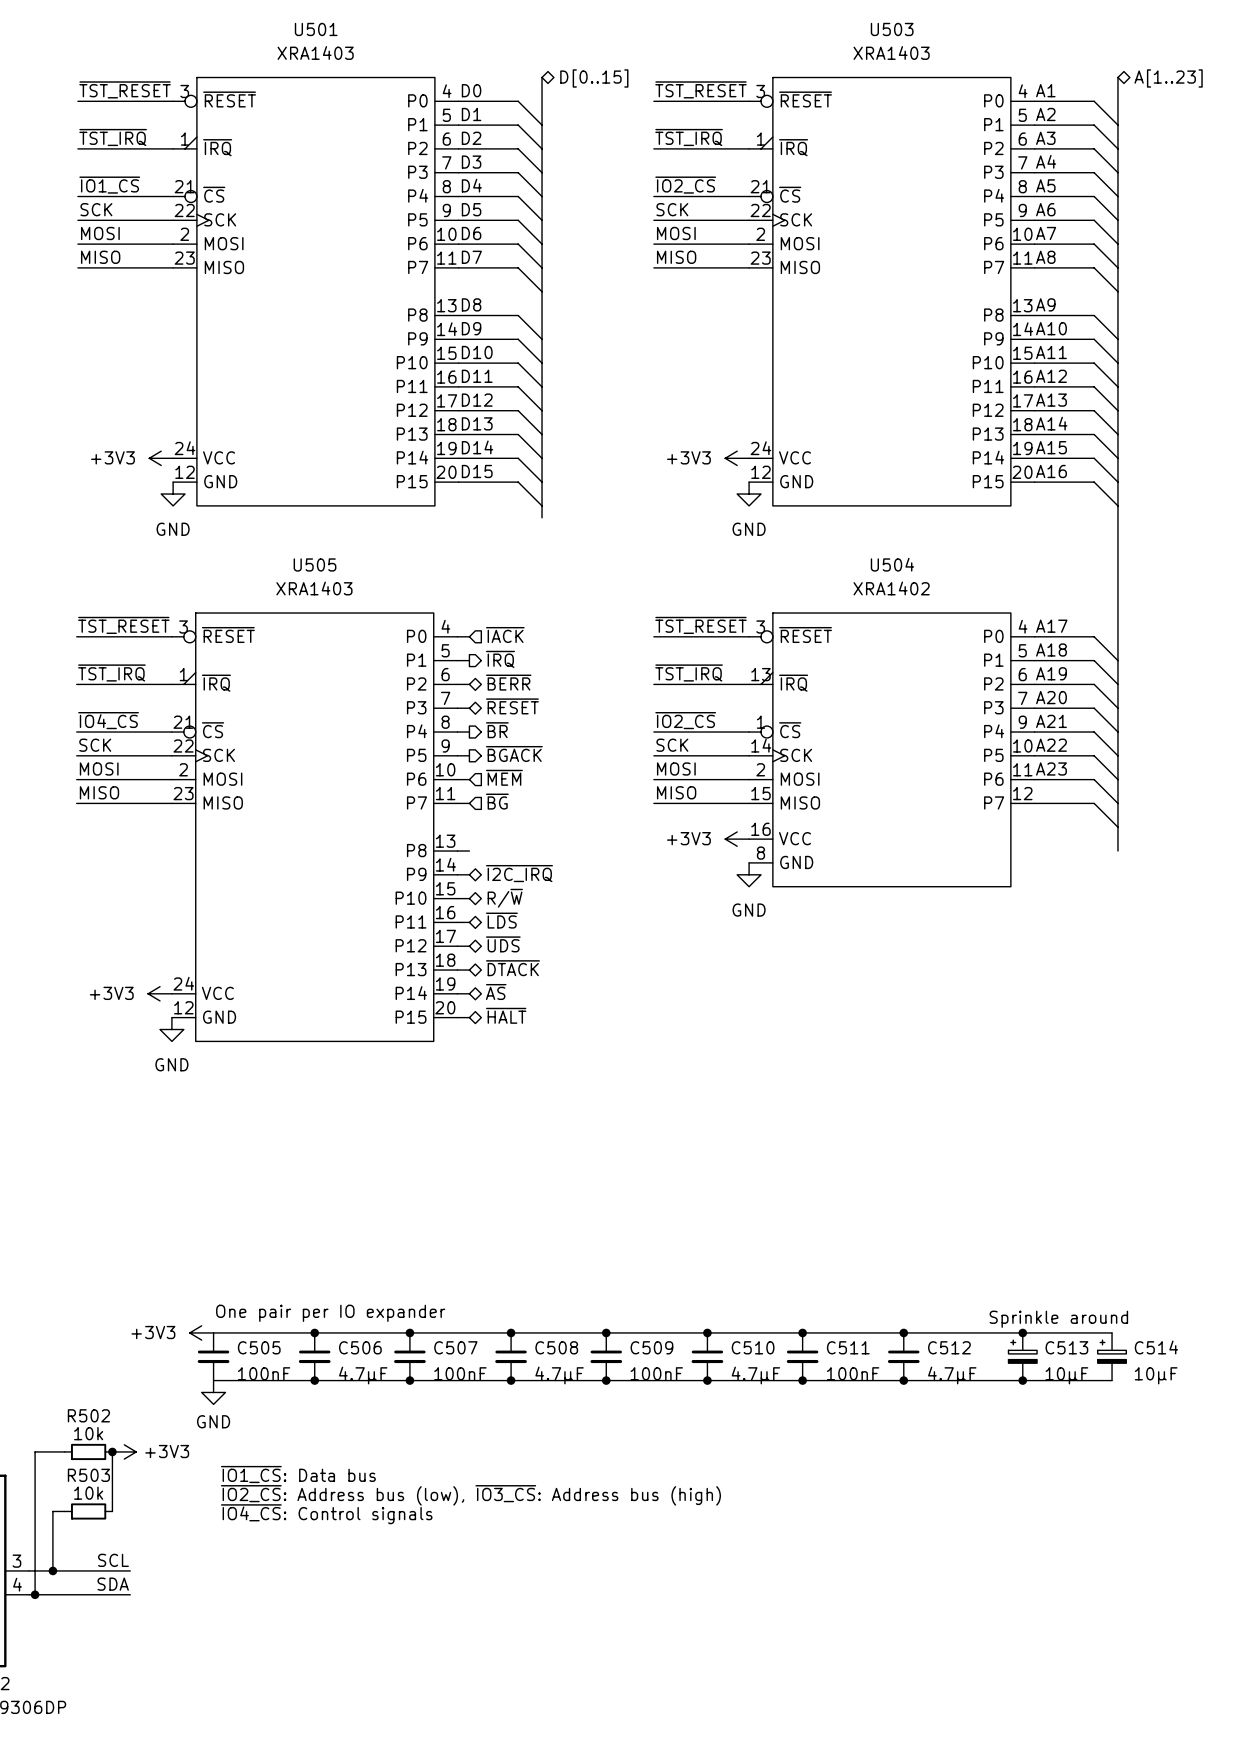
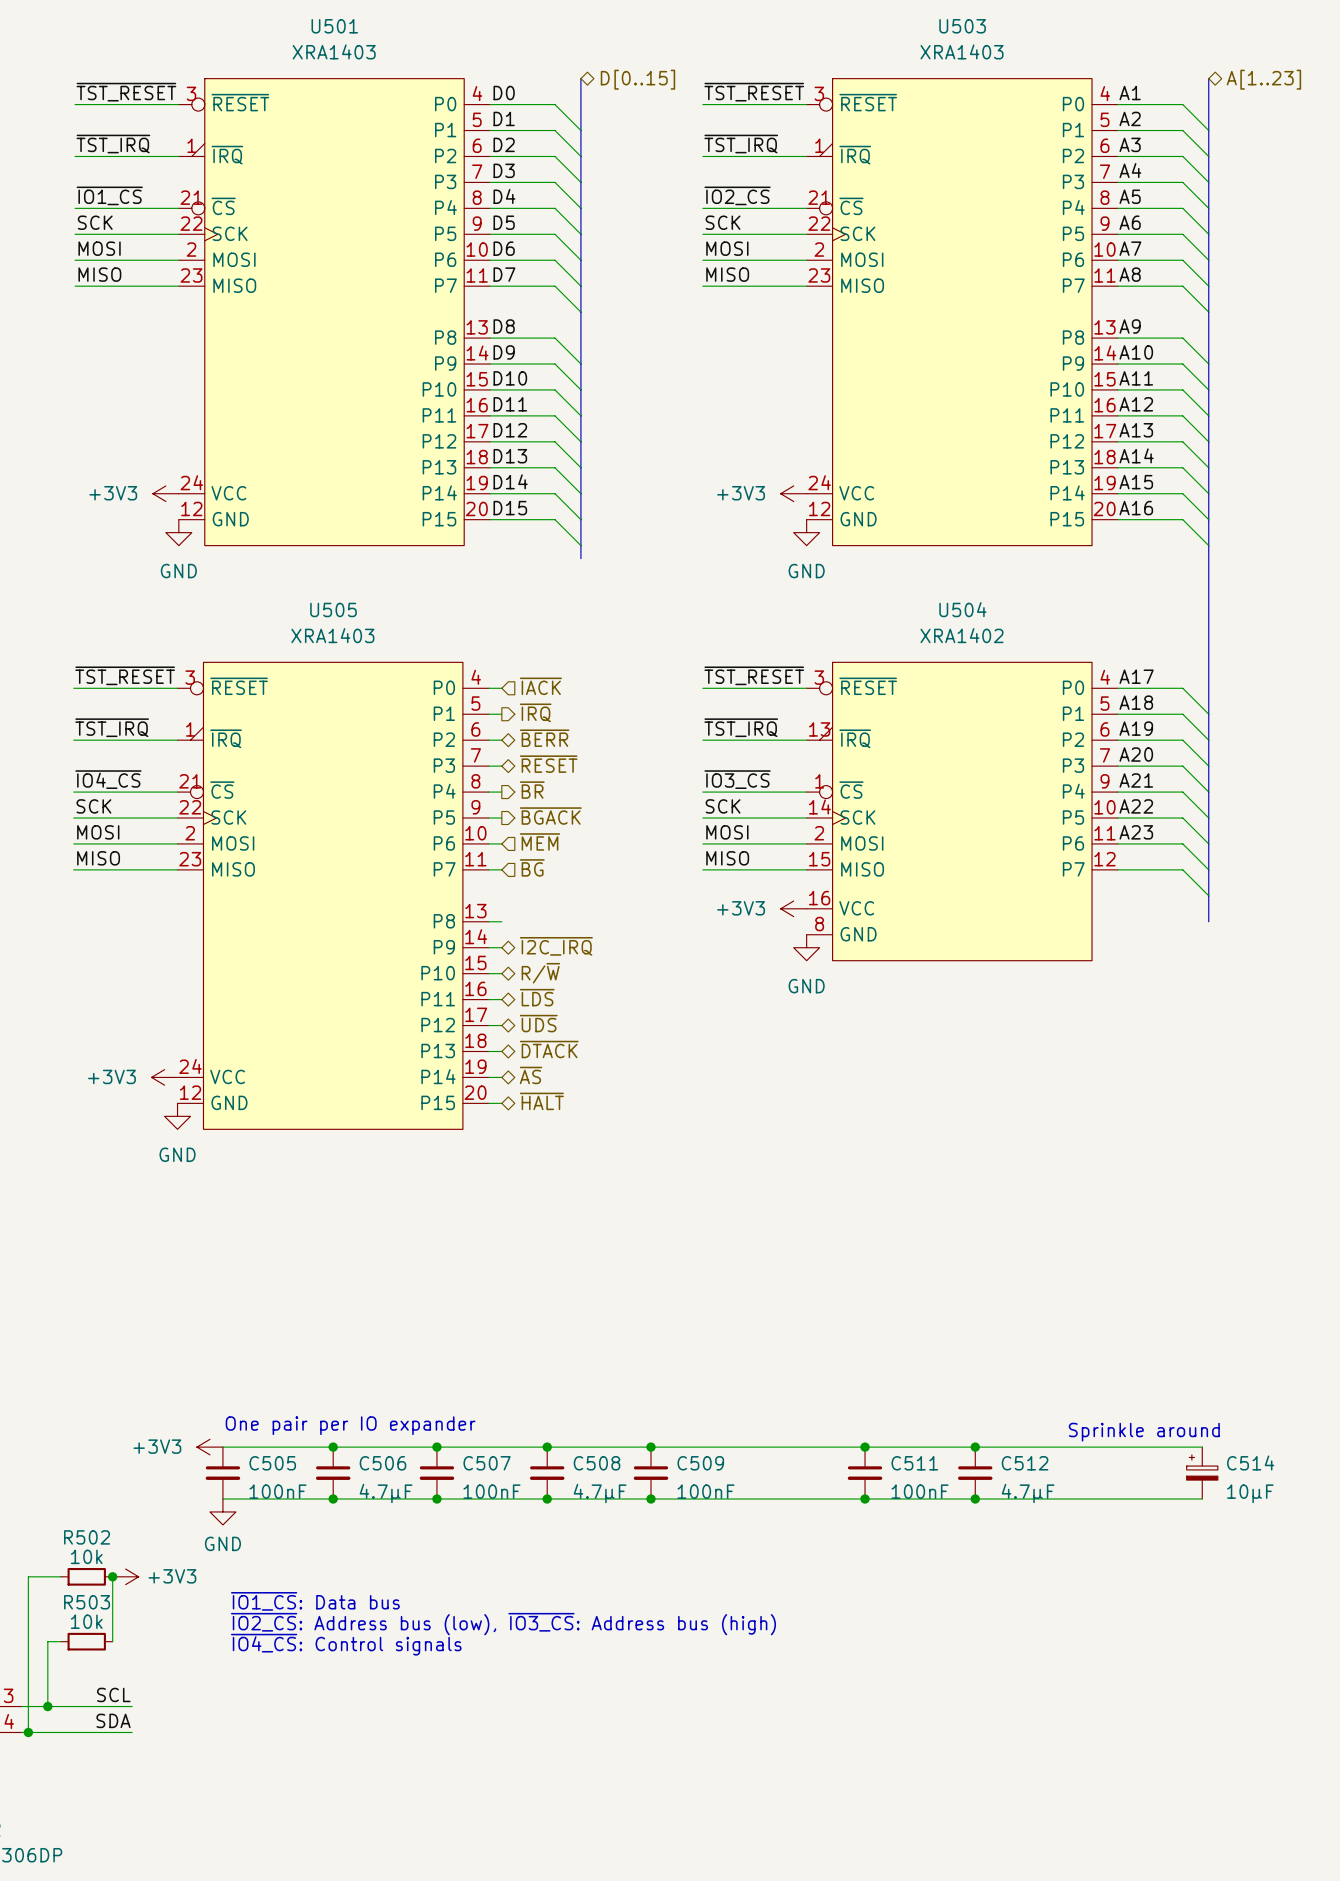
label: ~{IO2_CS} (685, 720) -> ~{IO3_CS} (737, 779)
junction: (707, 1332) -> none
junction: (1022, 1332) -> none
C510: 4.7µF (707, 1356) -> none
C513: 10µF (1022, 1356) -> none
junction: (707, 1380) -> none
junction: (1022, 1380) -> none

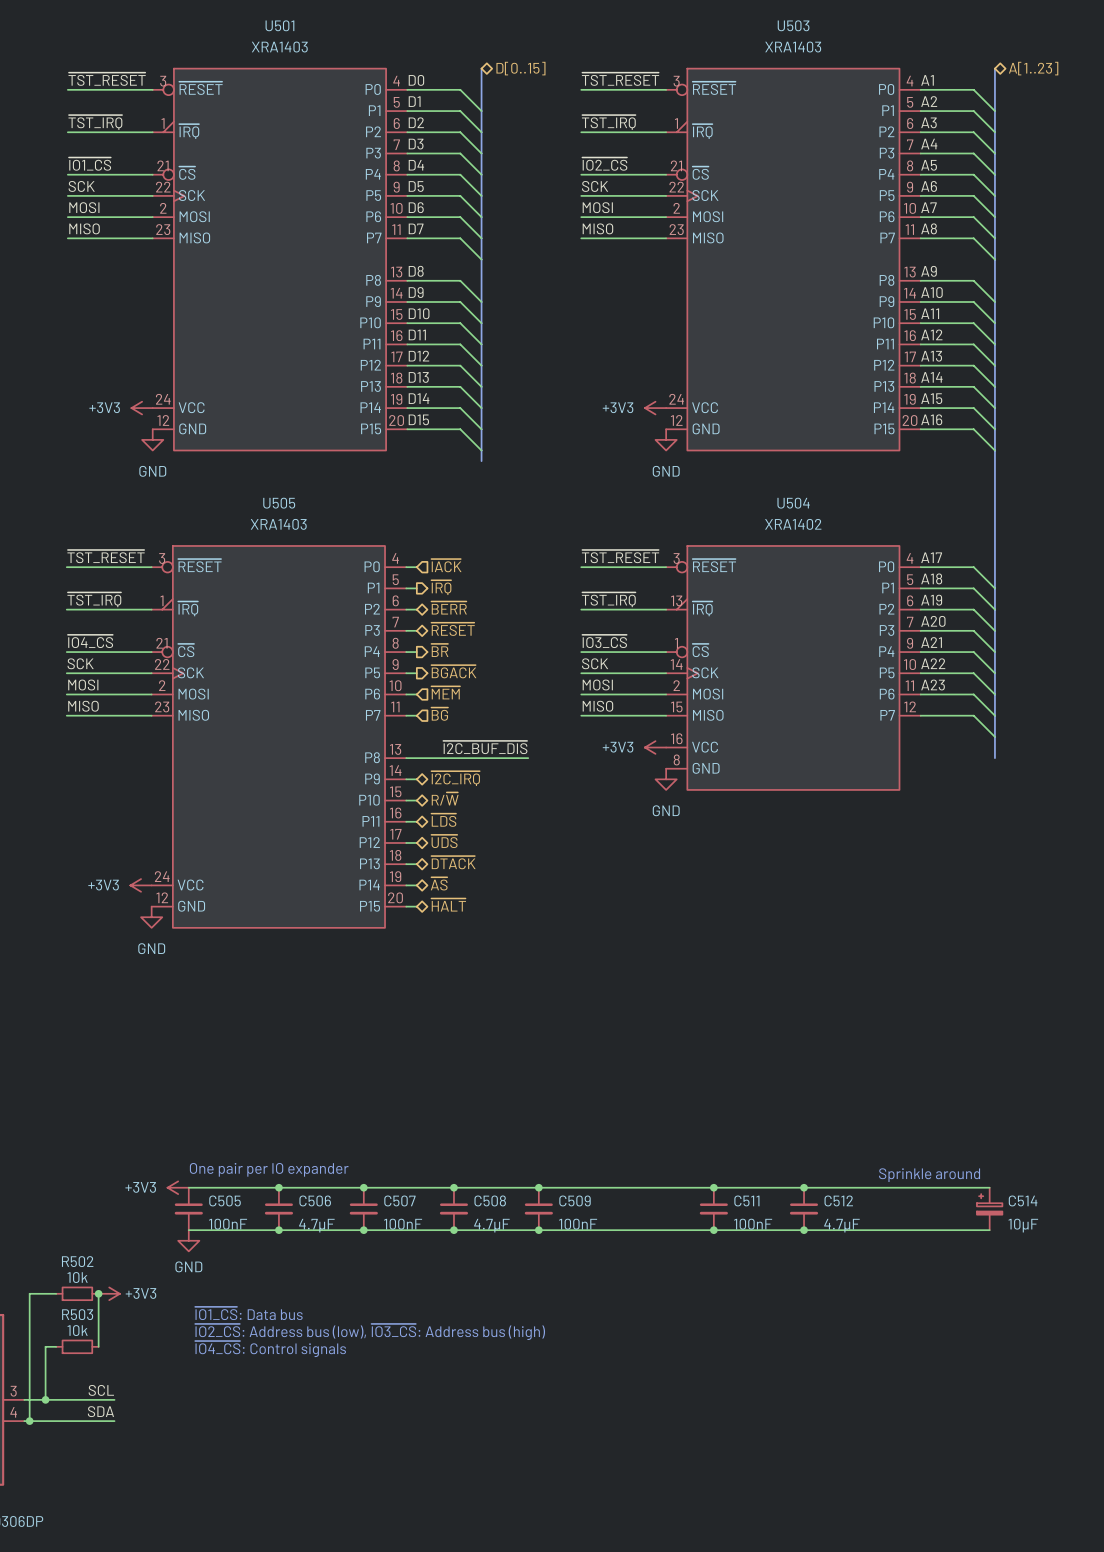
label: none -> ~{I2C_BUF_DIS} (485, 747)
wire: none -> (416, 758) (528, 758)

